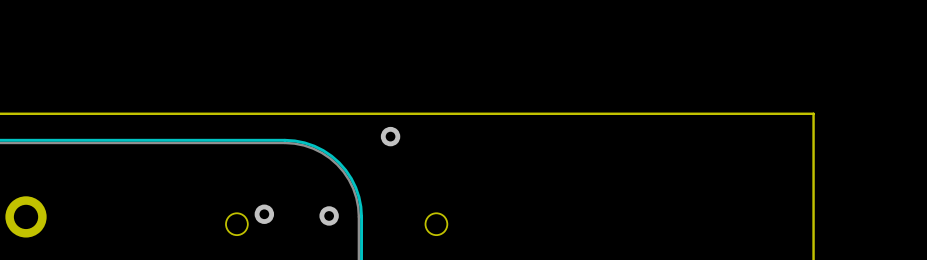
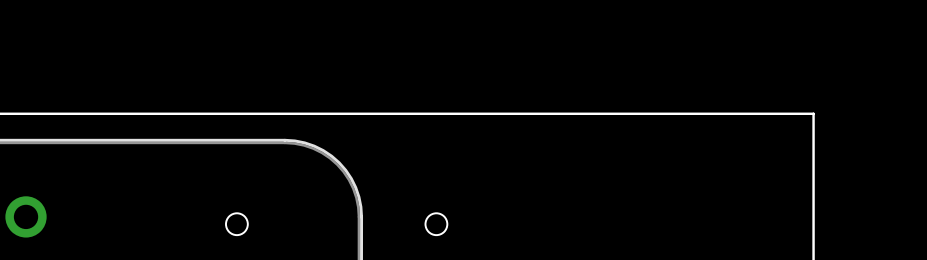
via: (390, 136) -> none
via: (264, 214) -> none
via: (329, 215) -> none

